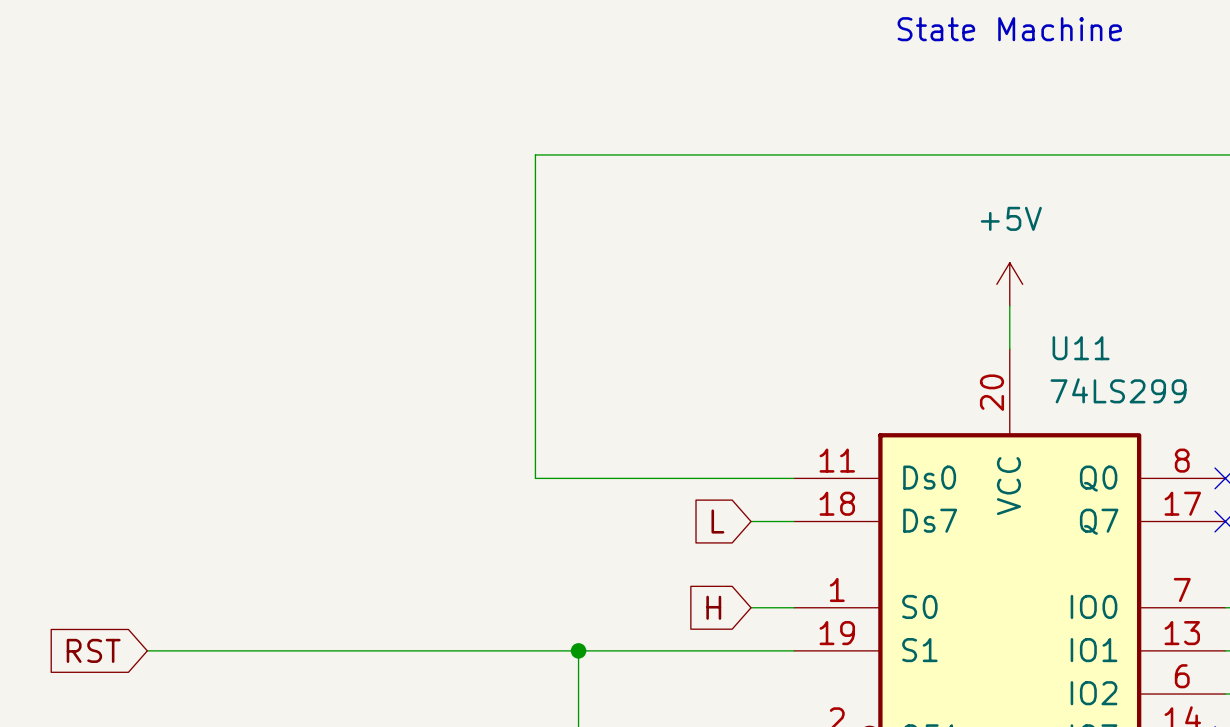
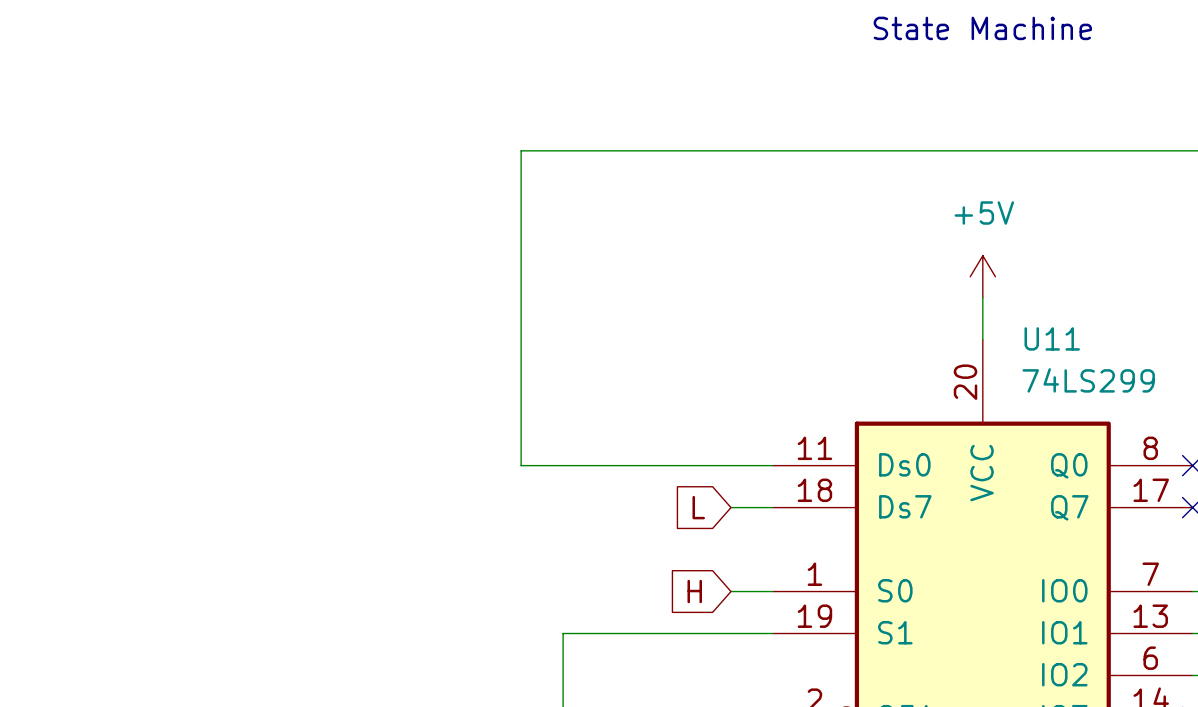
global label: RST (93, 650) -> none
wire: (147, 650) (578, 650) -> none
junction: (578, 650) -> none

